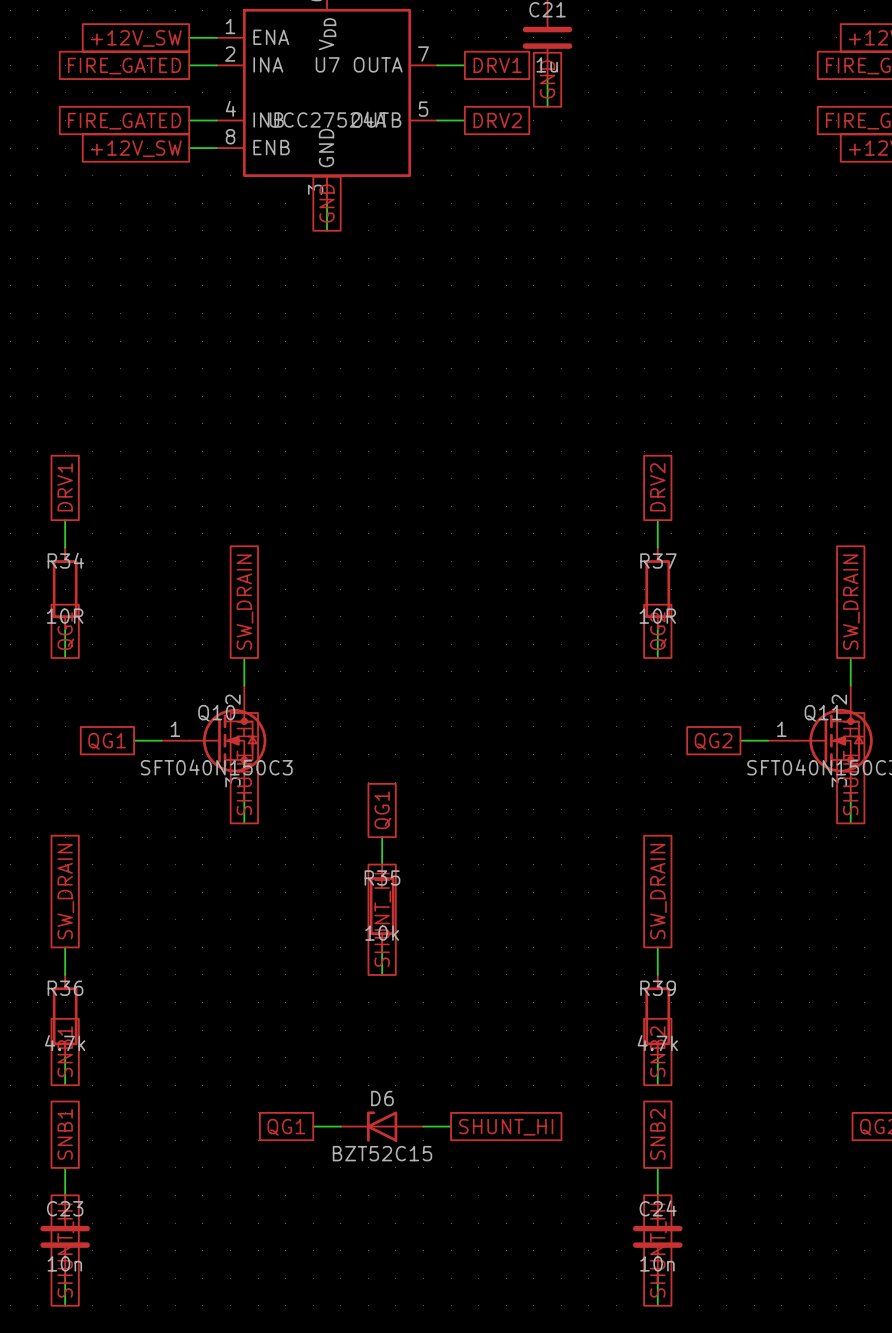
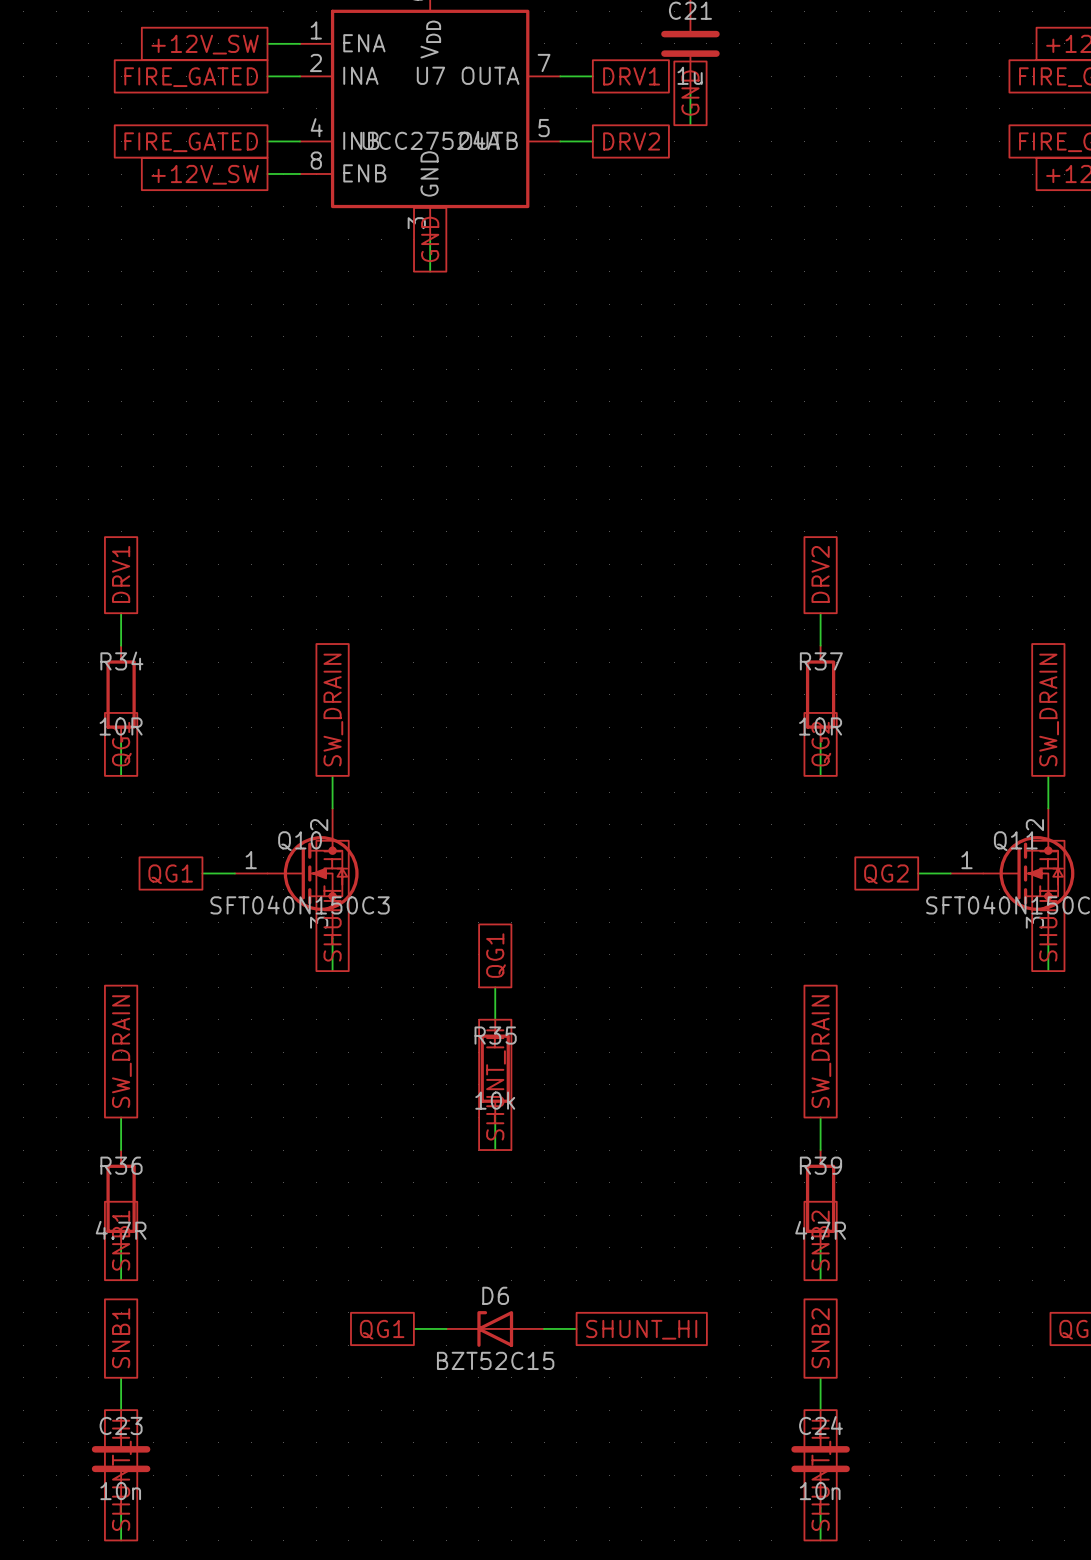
R36 value: 4.7k (65, 1043) -> 4.7R (121, 1230)
R39 value: 4.7k (657, 1043) -> 4.7R (820, 1230)

